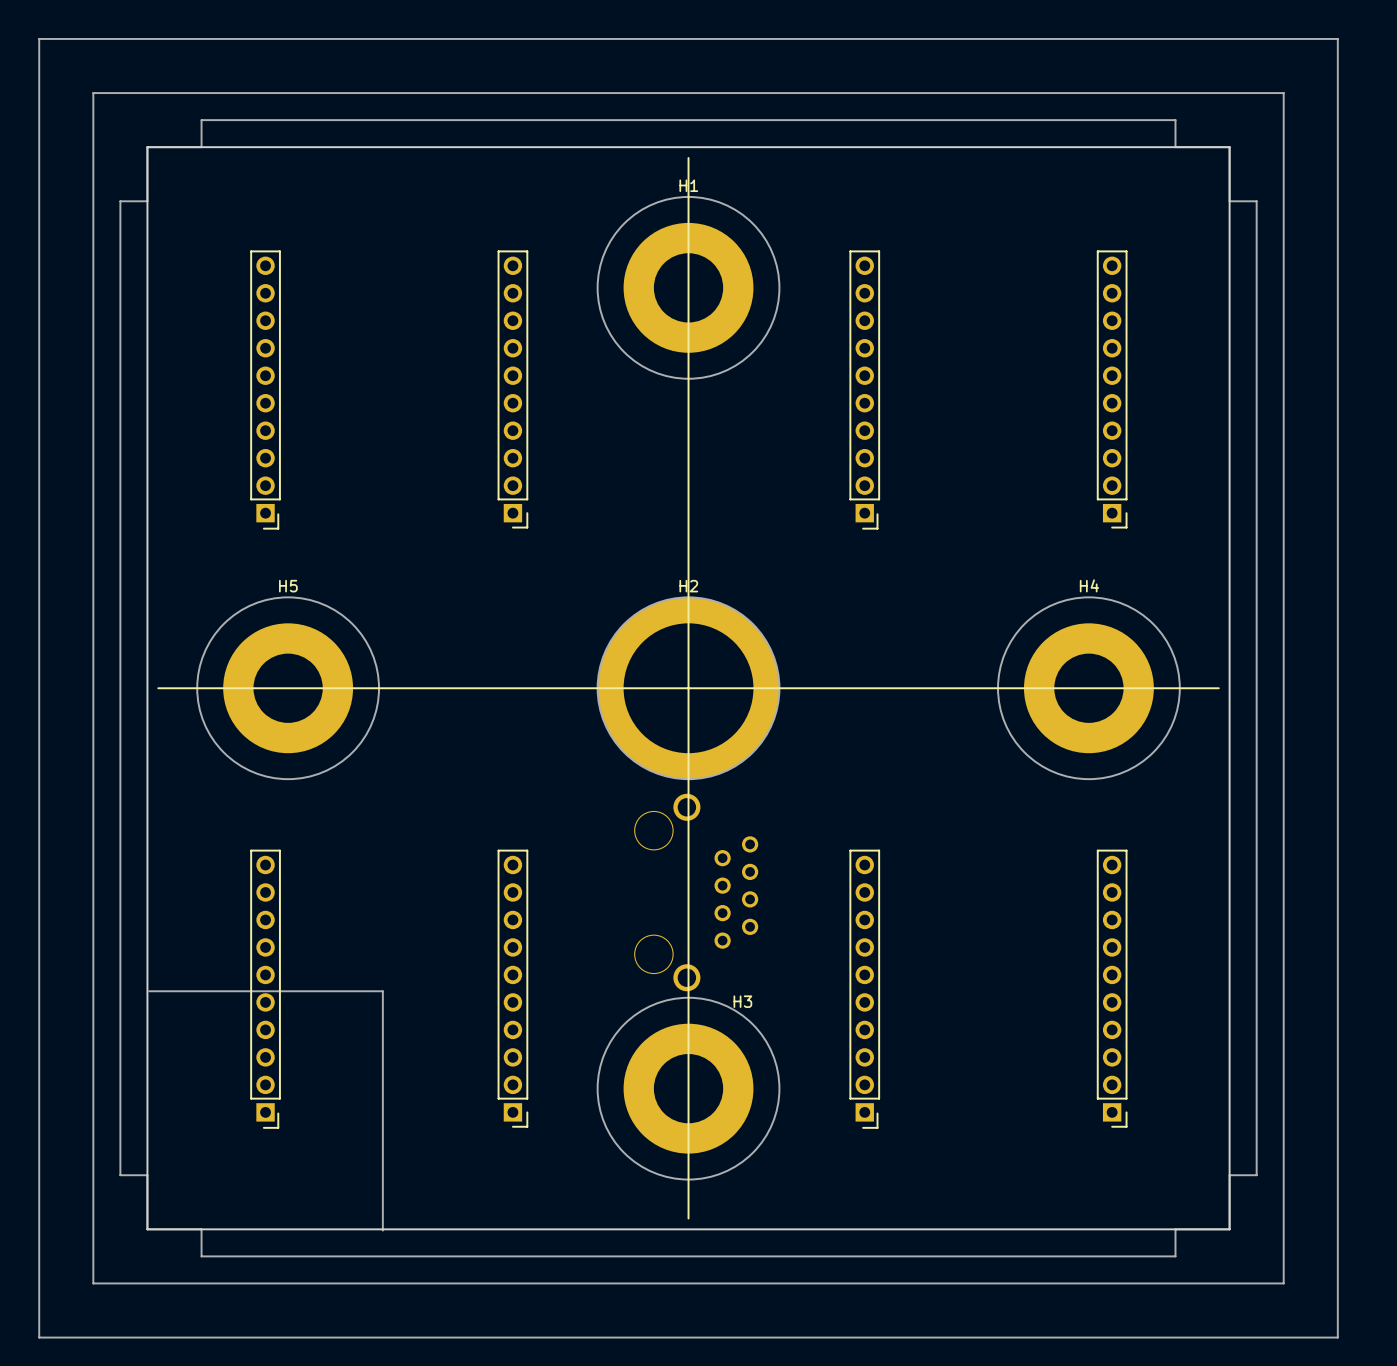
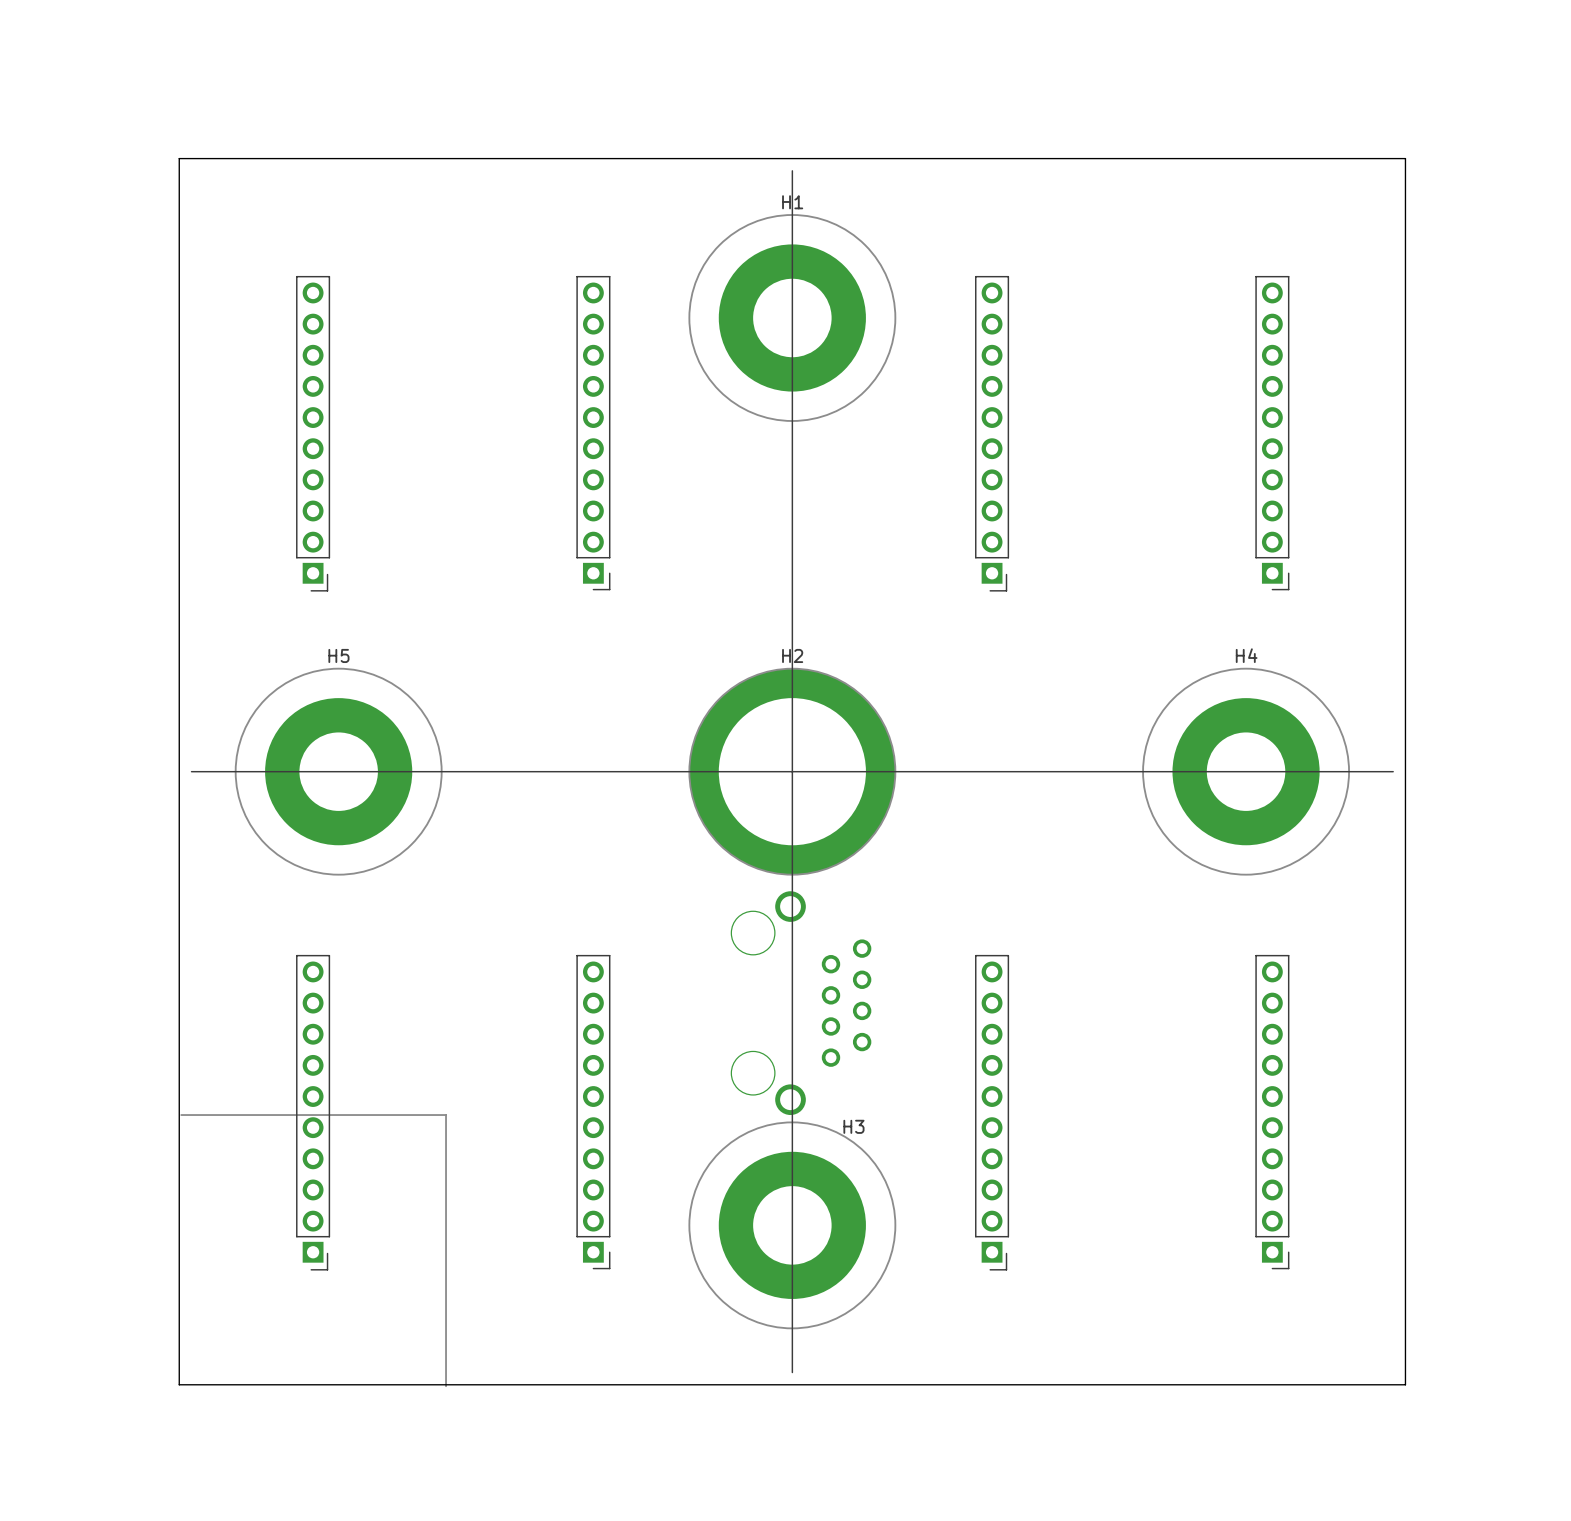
line: (39, 38) (1337, 38) (1337, 1337) (39, 1337) (39, 38) -> none
line: (93, 93) (1283, 93) (1283, 1283) (93, 1283) (93, 93) -> none
line: (201, 120) (1175, 120) (1175, 147) (1229, 147) (1229, 201) (1256, 201) (1256, 1175) (1229, 1175) (1229, 1229) (1175, 1229) (1175, 1256) (201, 1256) (201, 1229) (147, 1229) (147, 1175) (120, 1175) (120, 201) (147, 201) (147, 147) (201, 147) (201, 120) -> none

